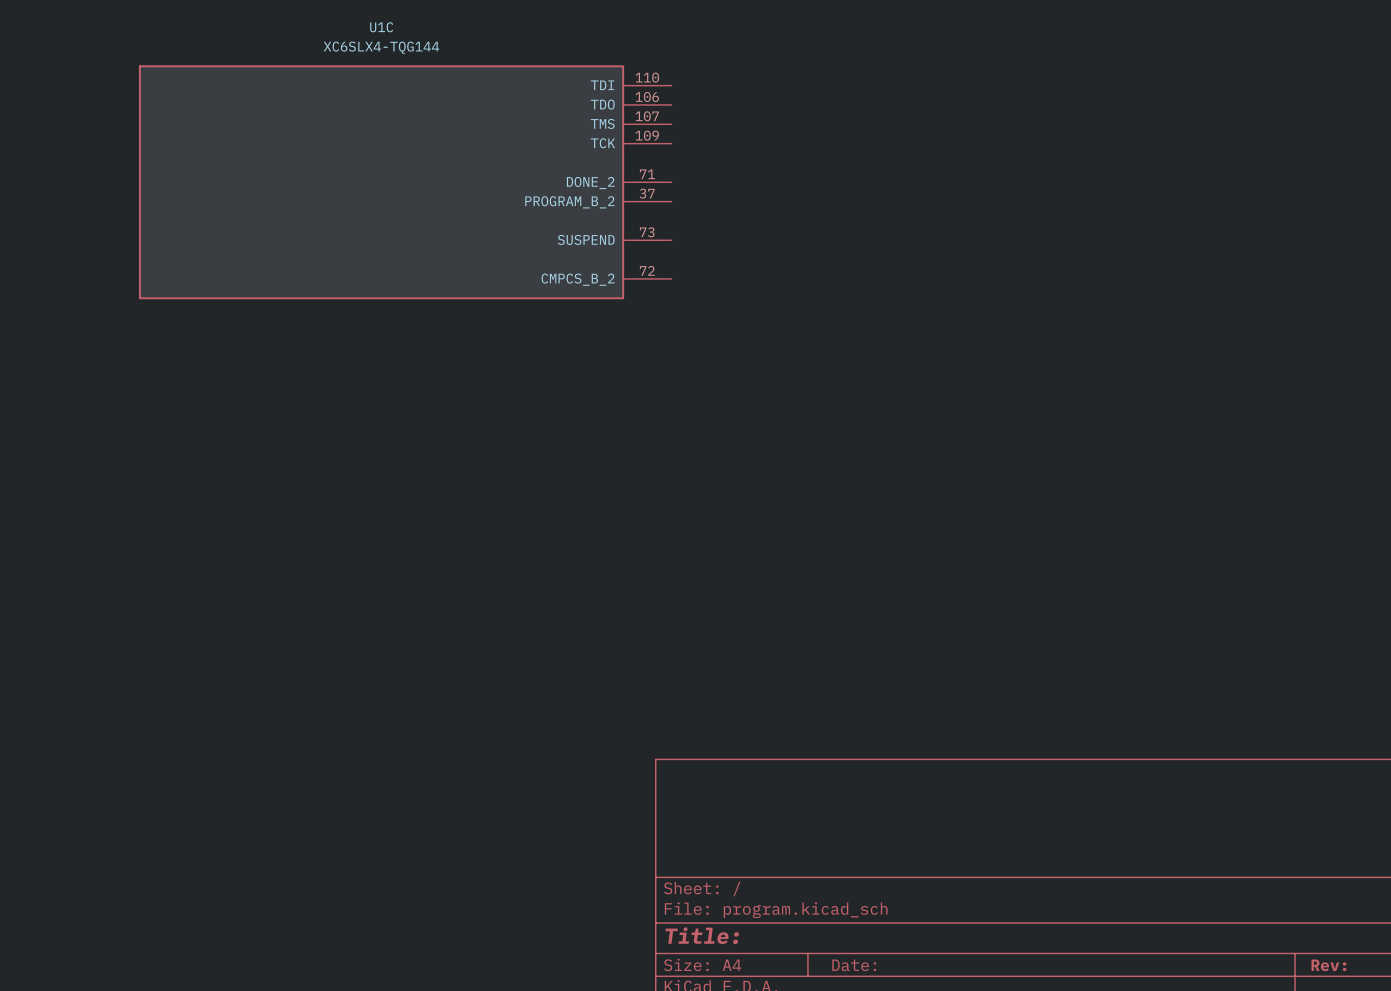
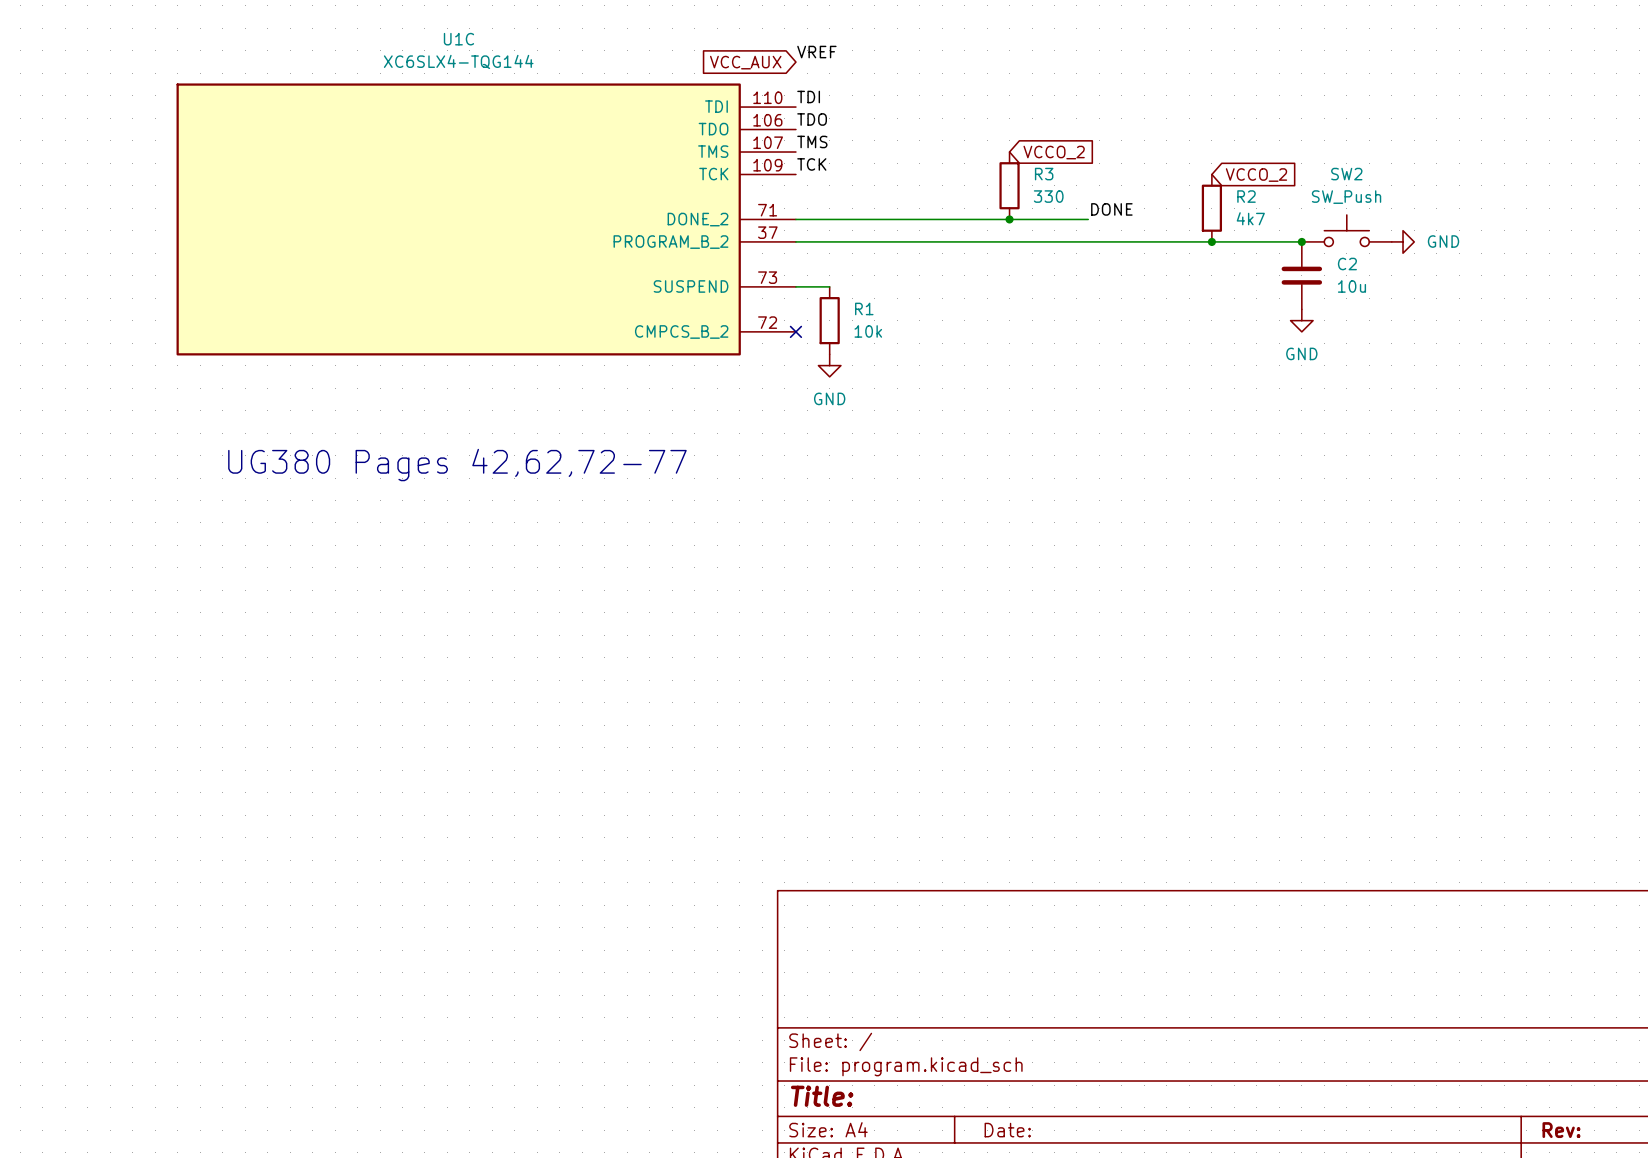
label: none -> VREF (816, 52)
global label: none -> VCC_AUX (745, 62)
label: none -> TDI (808, 97)
label: none -> TDO (812, 119)
label: none -> TMS (812, 141)
global label: none -> VCCO_2 (1054, 152)
label: none -> TCK (811, 164)
global label: none -> VCCO_2 (1256, 175)
R3: none -> 330 (1009, 185)
R2: none -> 4k7 (1211, 208)
label: none -> DONE (1111, 209)
wire: none -> (795, 219) (1088, 219)
junction: none -> (1009, 219)
SW2: none -> SW_Push (1346, 230)
wire: none -> (795, 241) (1301, 241)
junction: none -> (1211, 241)
junction: none -> (1301, 241)
power symbol: none -> GND (1403, 241)
C2: none -> 10u (1301, 275)
wire: none -> (795, 286) (829, 286)
R1: none -> 10k (829, 320)
power symbol: none -> GND (1301, 320)
no-connect mark: none -> (795, 331)
power symbol: none -> GND (829, 365)
text: none -> UG380 Pages 42,62,72-77 (457, 465)

